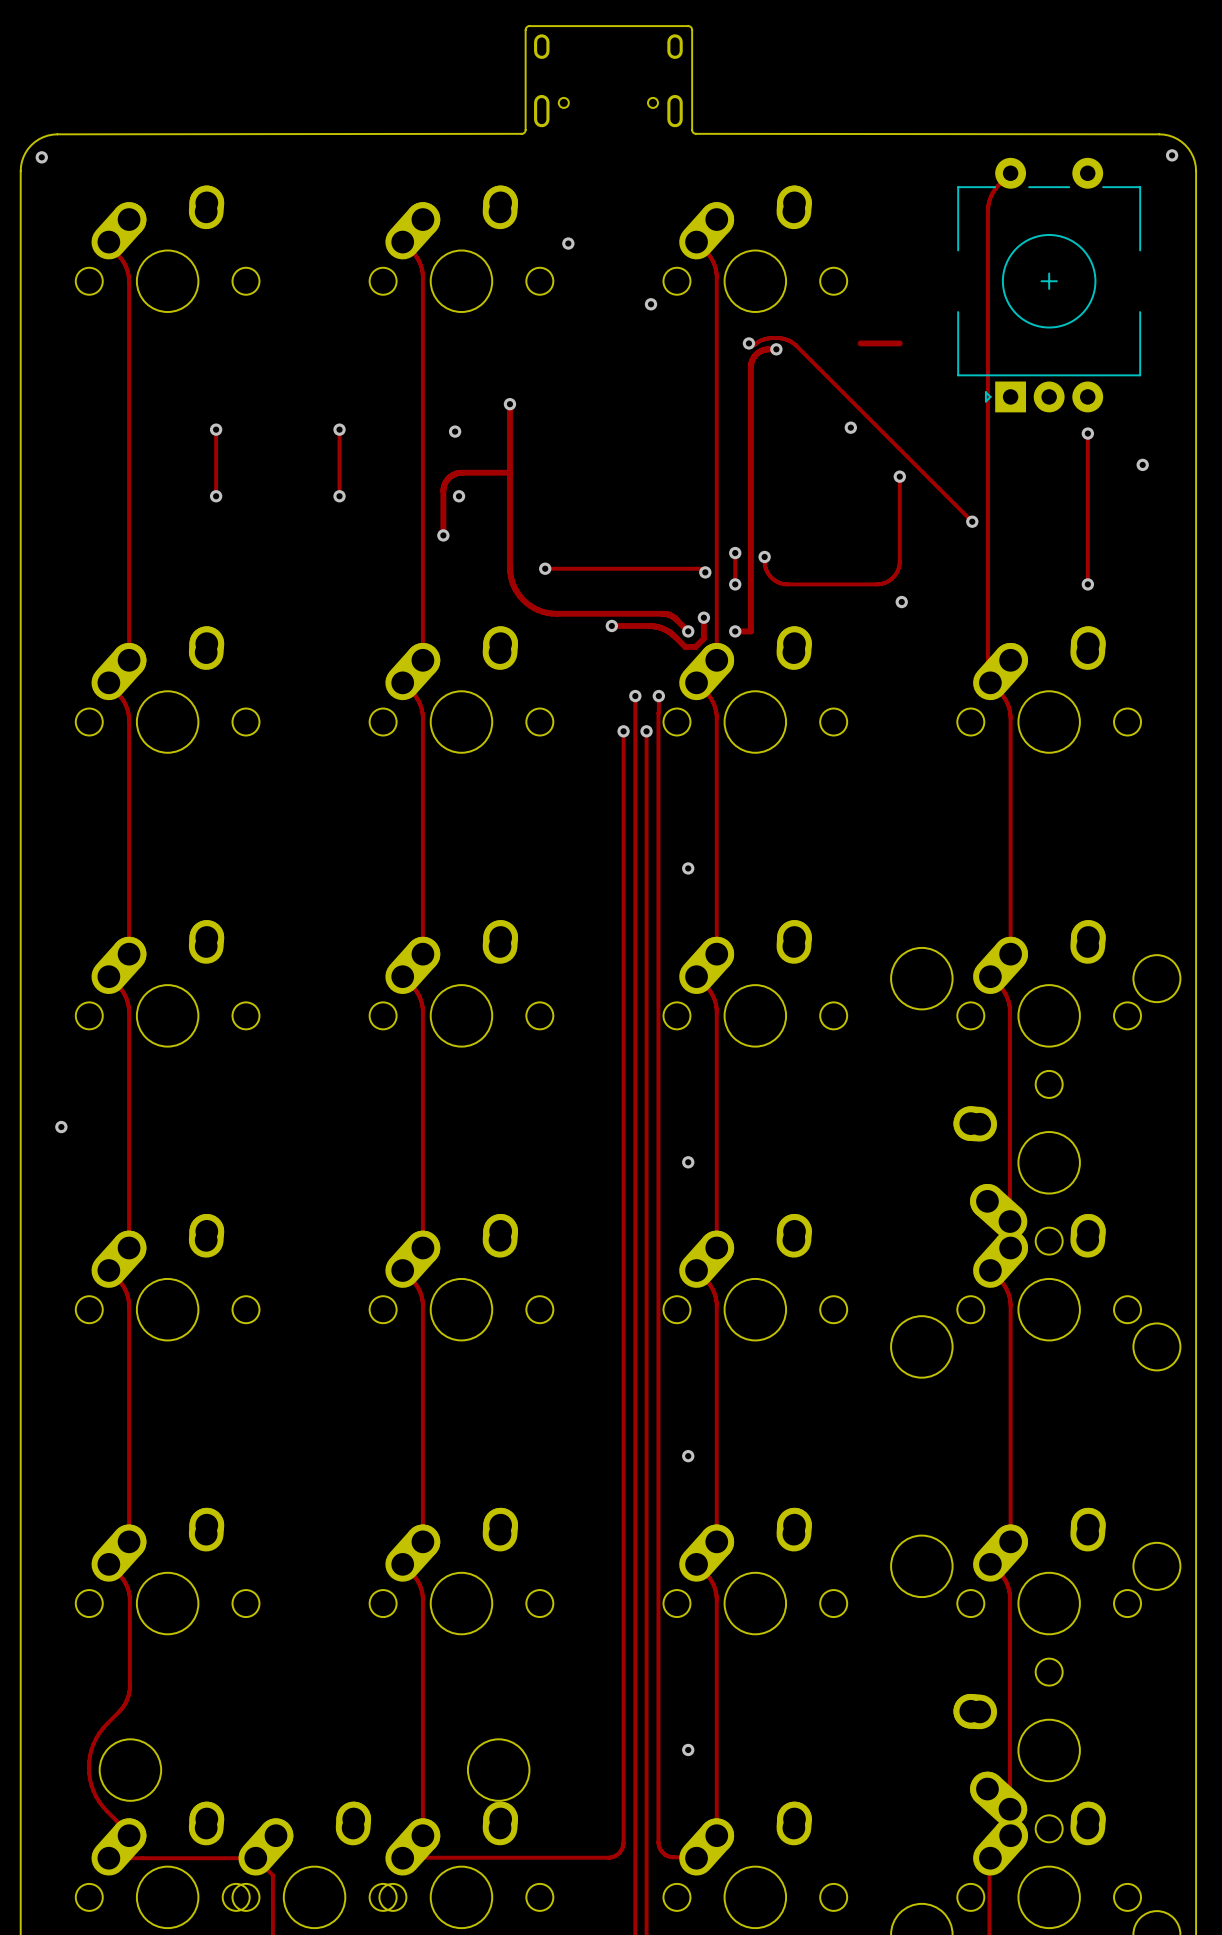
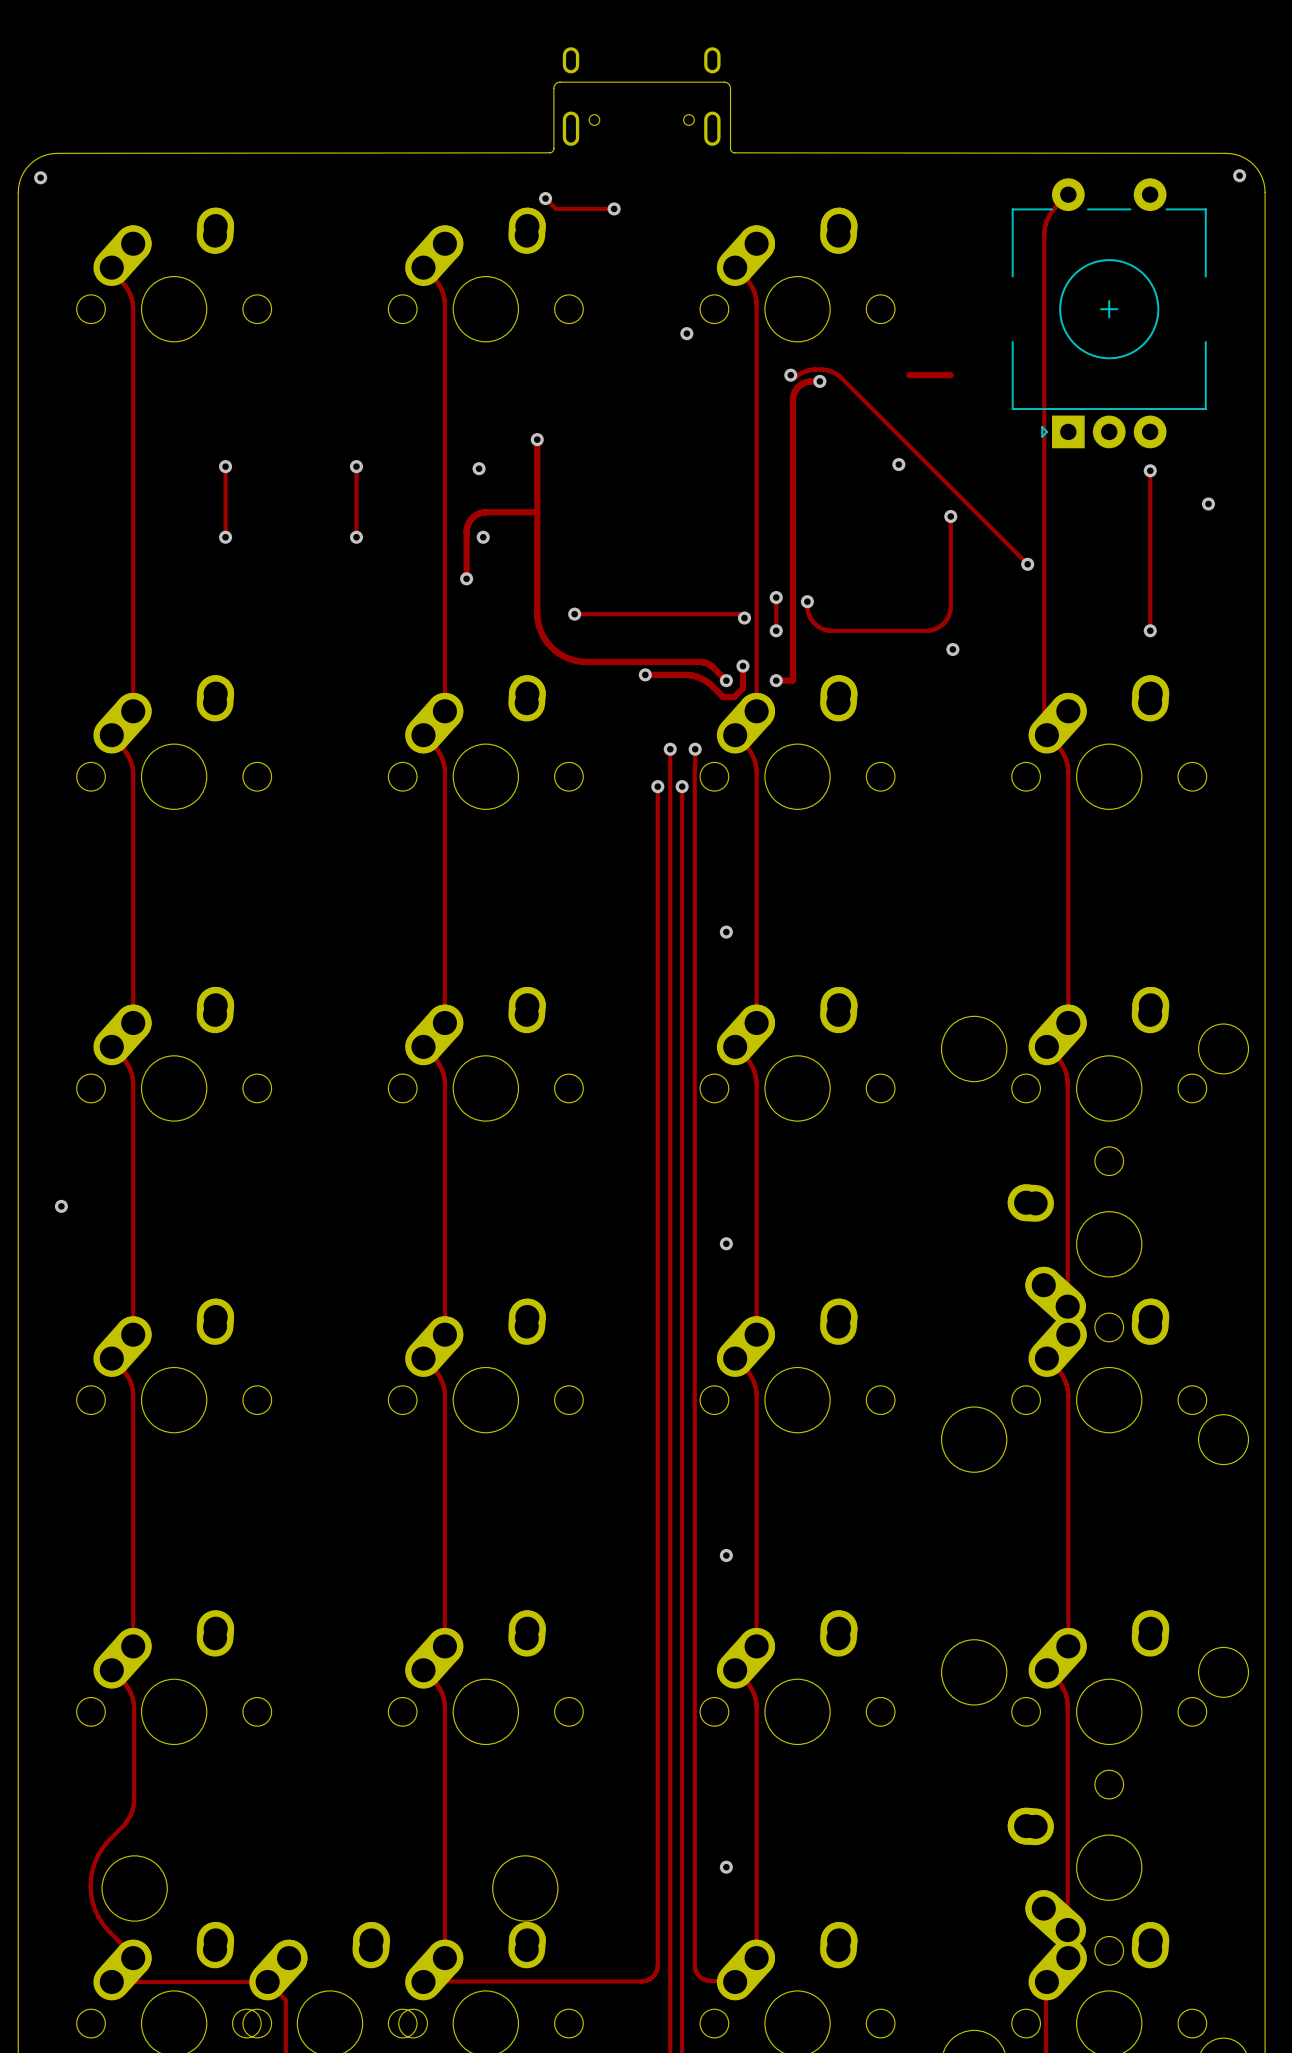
board edge: (525, 73) (525, 29) (529, 26) (689, 26) (692, 30) (692, 73) -> (553, 88) (555, 84) (560, 82) (724, 82) (728, 84) (730, 88)
track: none -> (545, 198) (555, 208) (614, 208)
via: none -> (545, 198)
via: none -> (614, 208)
via: (568, 243) -> none

